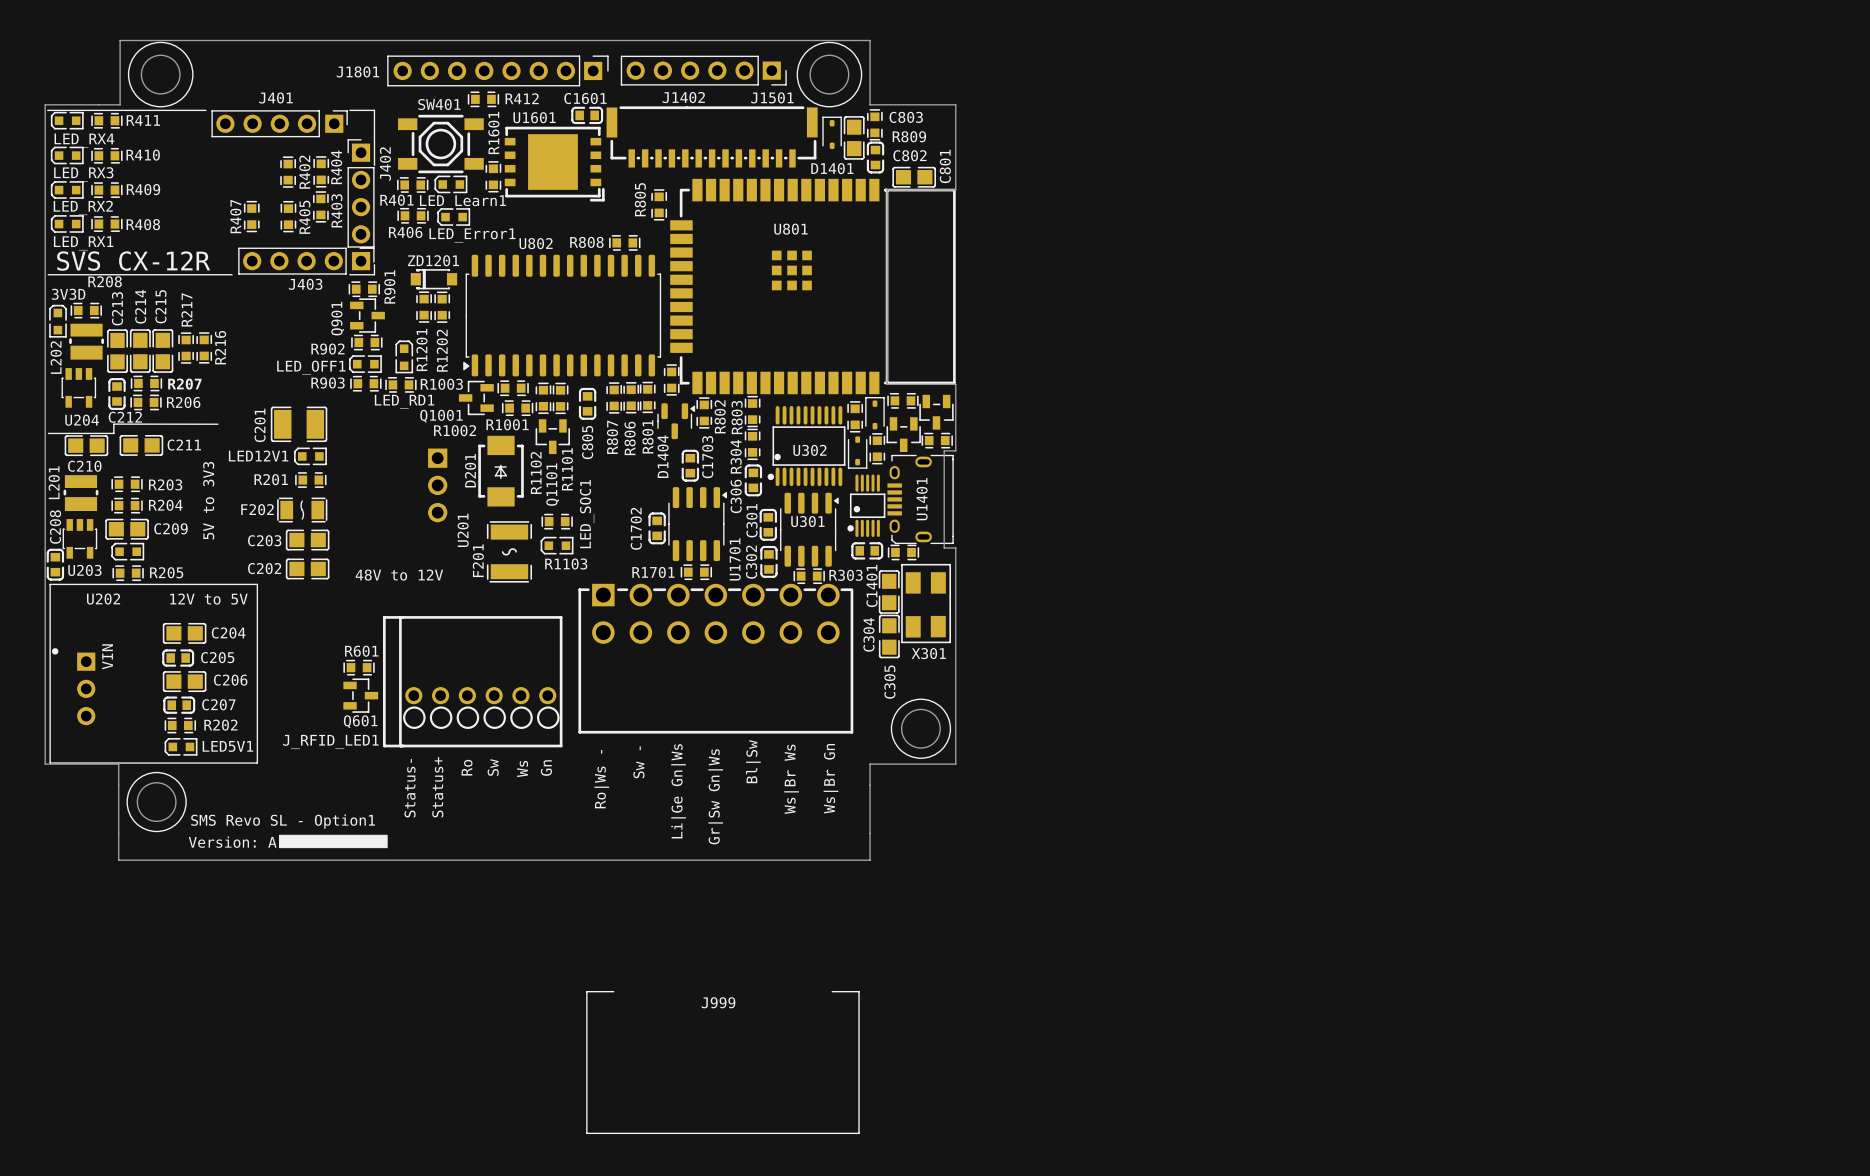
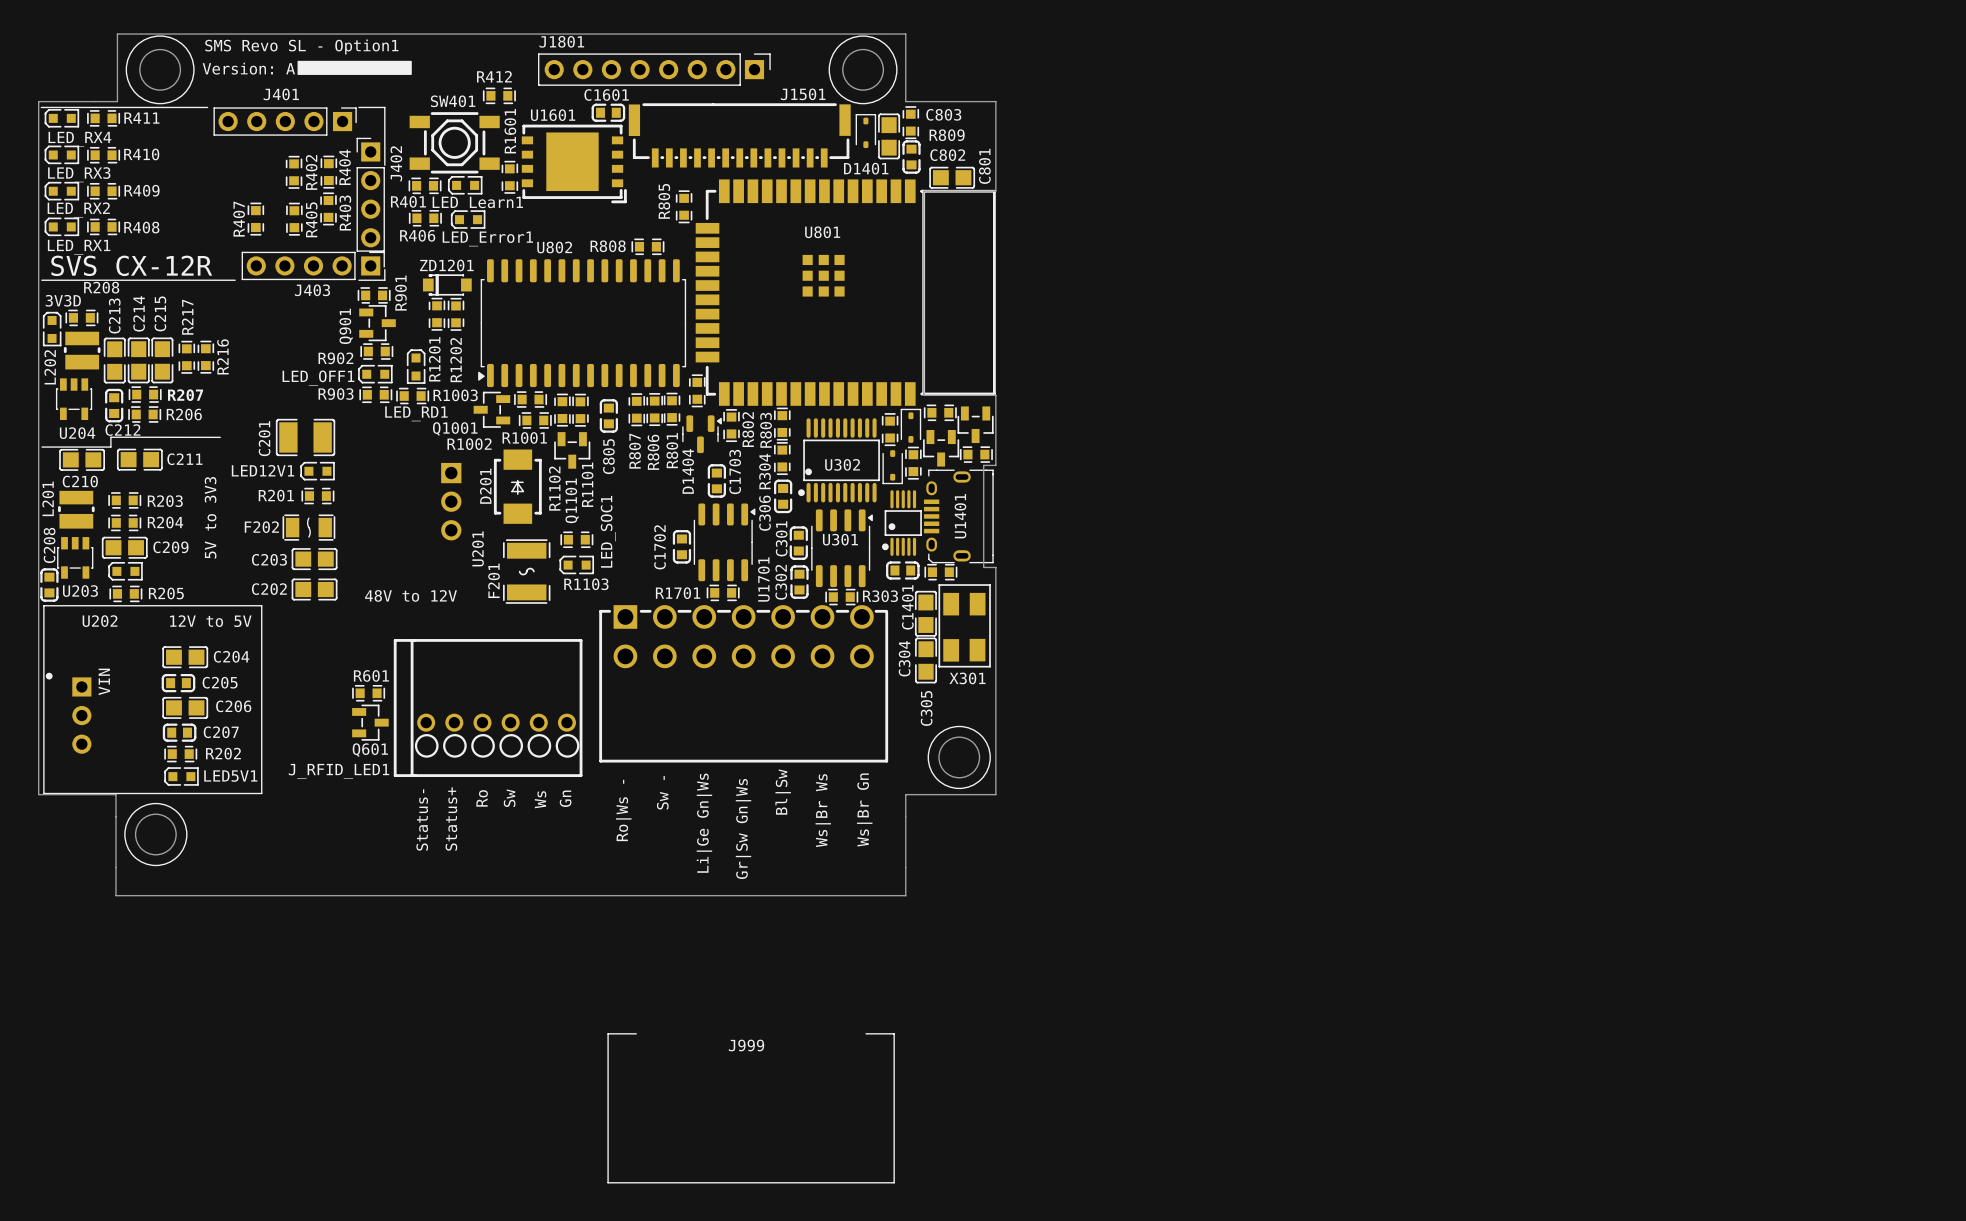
text: none -> SMS Revo SL - Option1 (301, 46)
drawing: none -> [297, 60, 412, 75]
J1801 position: (497, 70) -> (654, 69)
J1402: (703, 70) -> none
J1801 name position: J1801 (357, 71) -> J1801 (561, 41)
text: none -> Version: A (248, 68)
R412 name position: R412 (522, 98) -> R412 (494, 76)
text: SMS Revo SL - Option1 (283, 821) -> none
drawing: [279, 834, 388, 849] -> none
text: Version: A (232, 842) -> none

